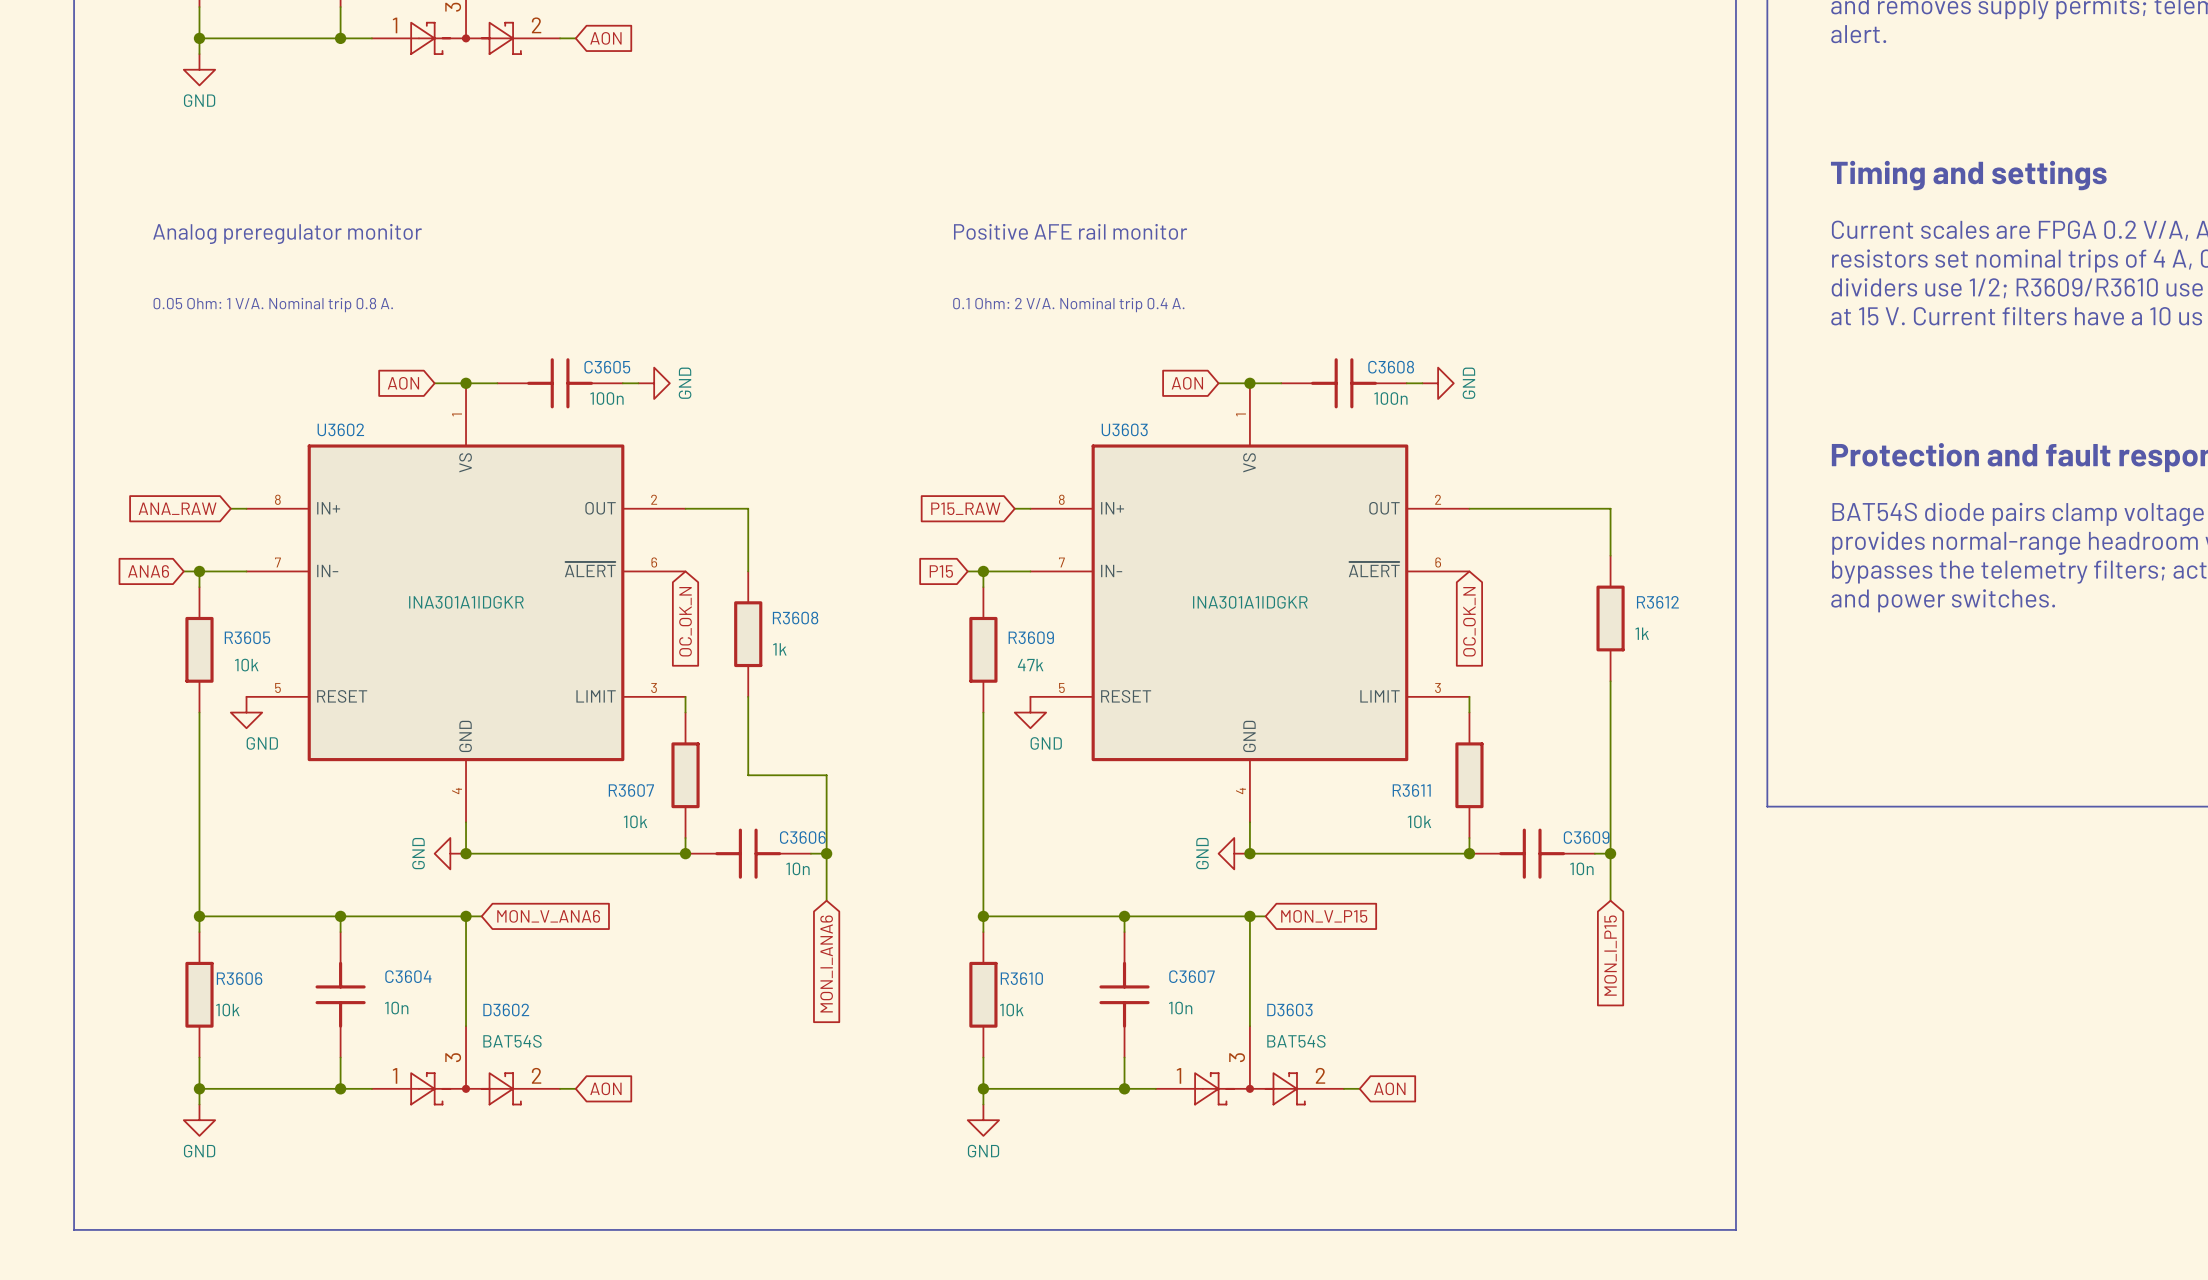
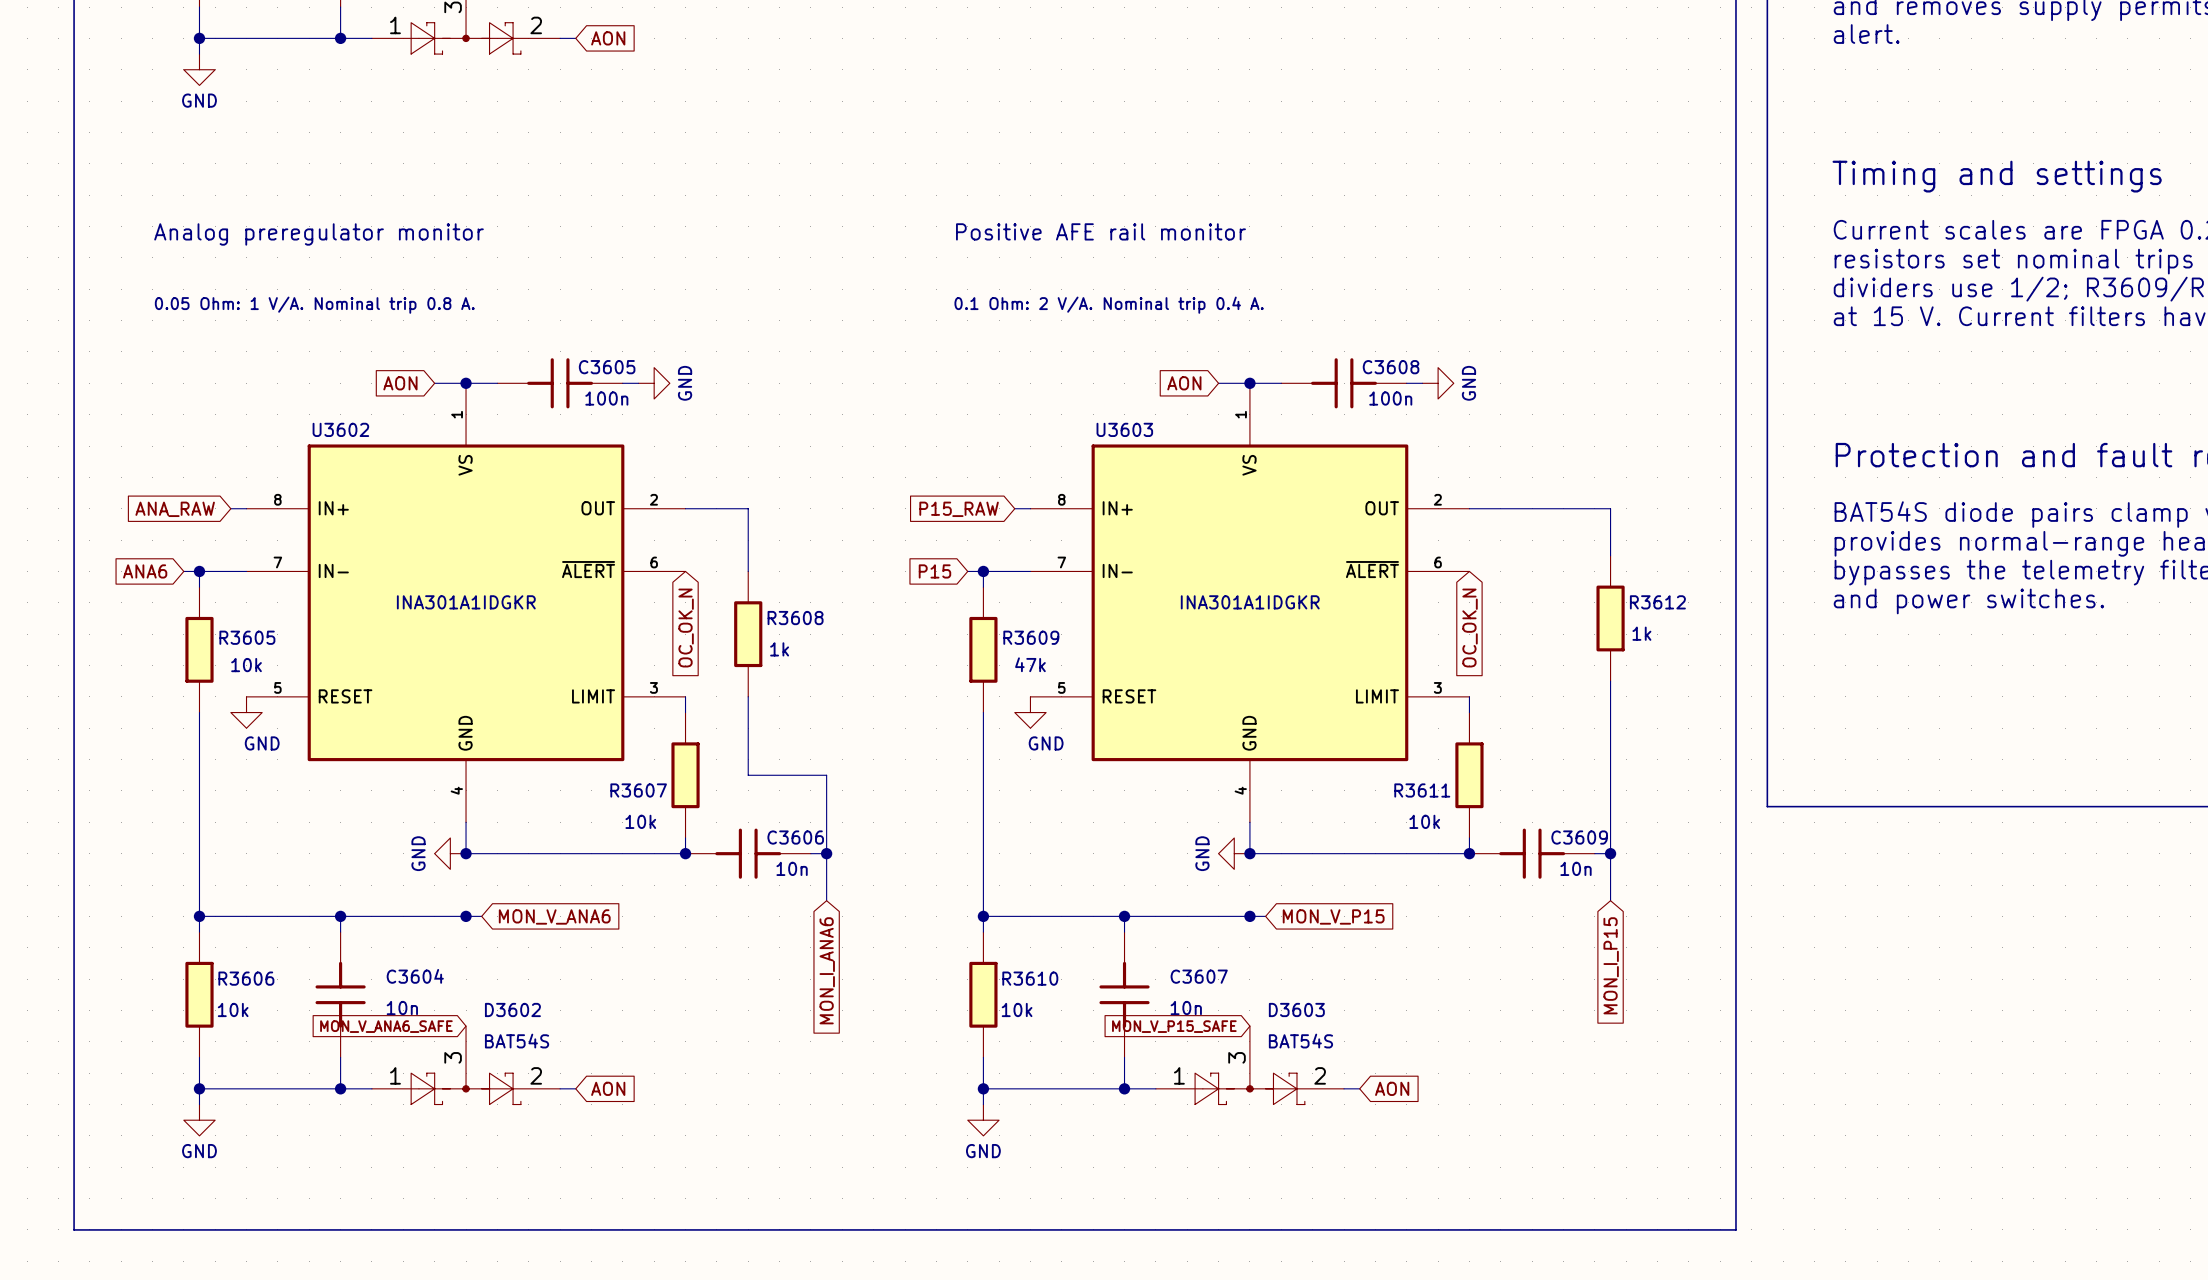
wire: (466, 916) (466, 1026) -> none
wire: (1249, 916) (1249, 1026) -> none
global label: none -> MON_V_ANA6_SAFE (386, 1026)
global label: none -> MON_V_P15_SAFE (1174, 1026)

